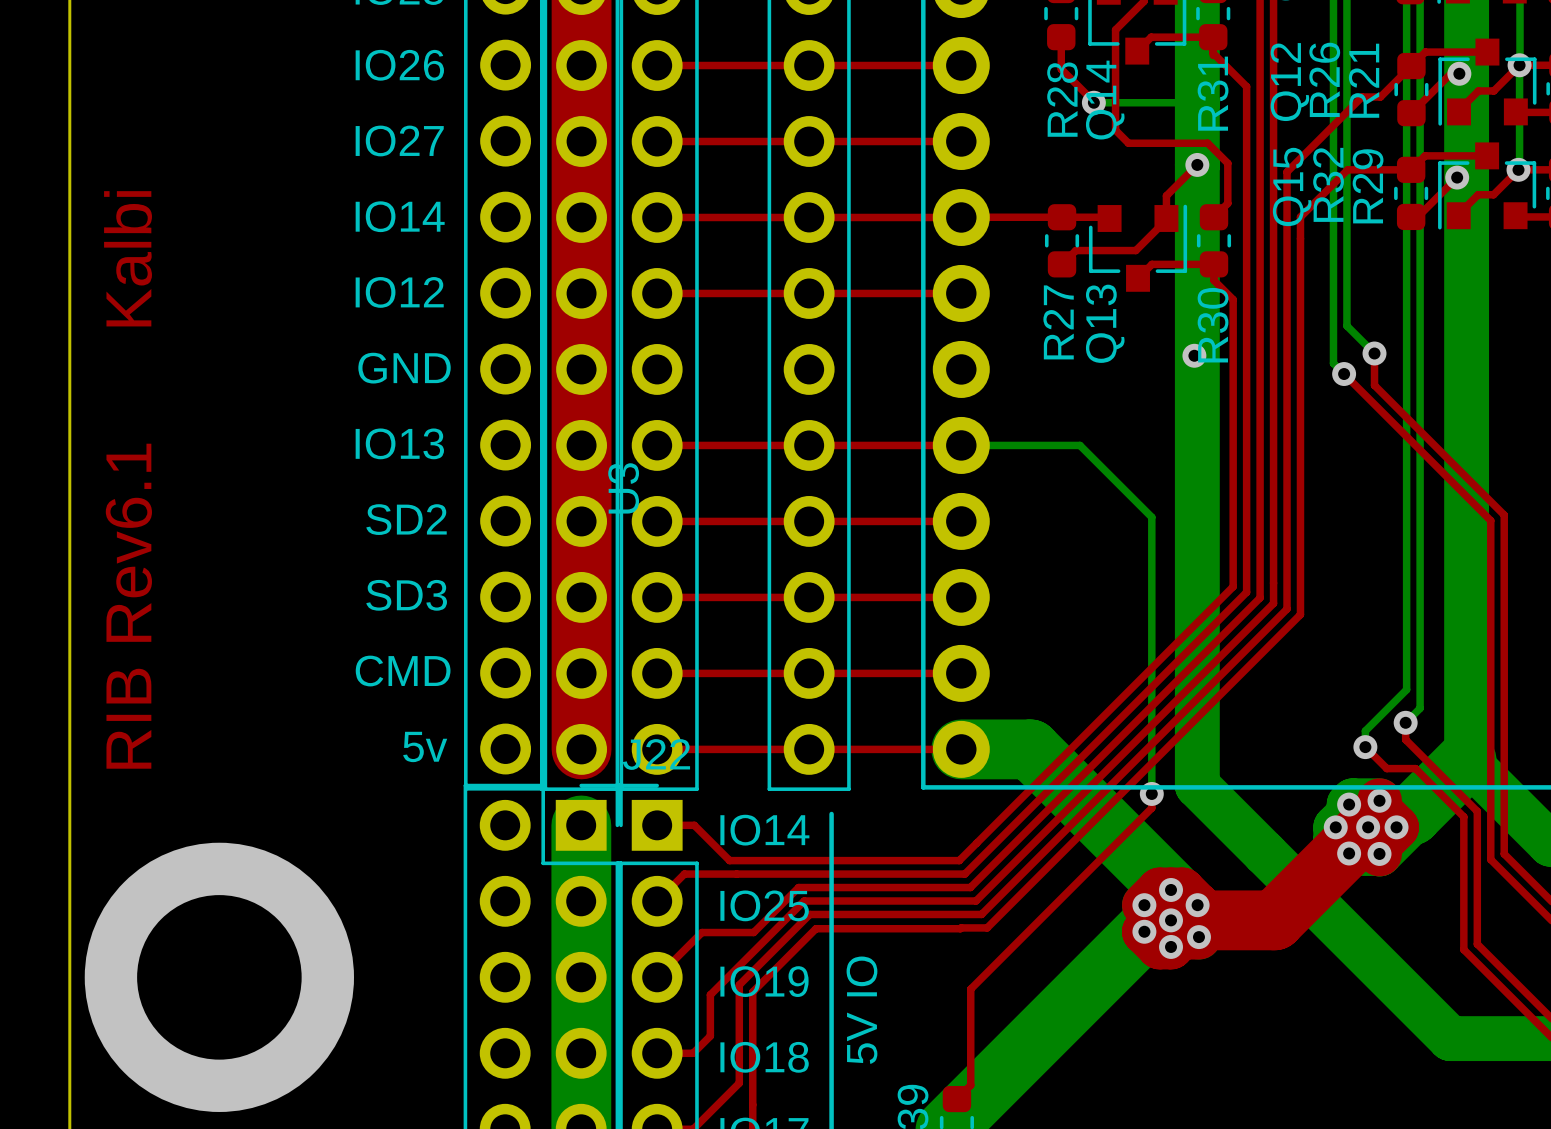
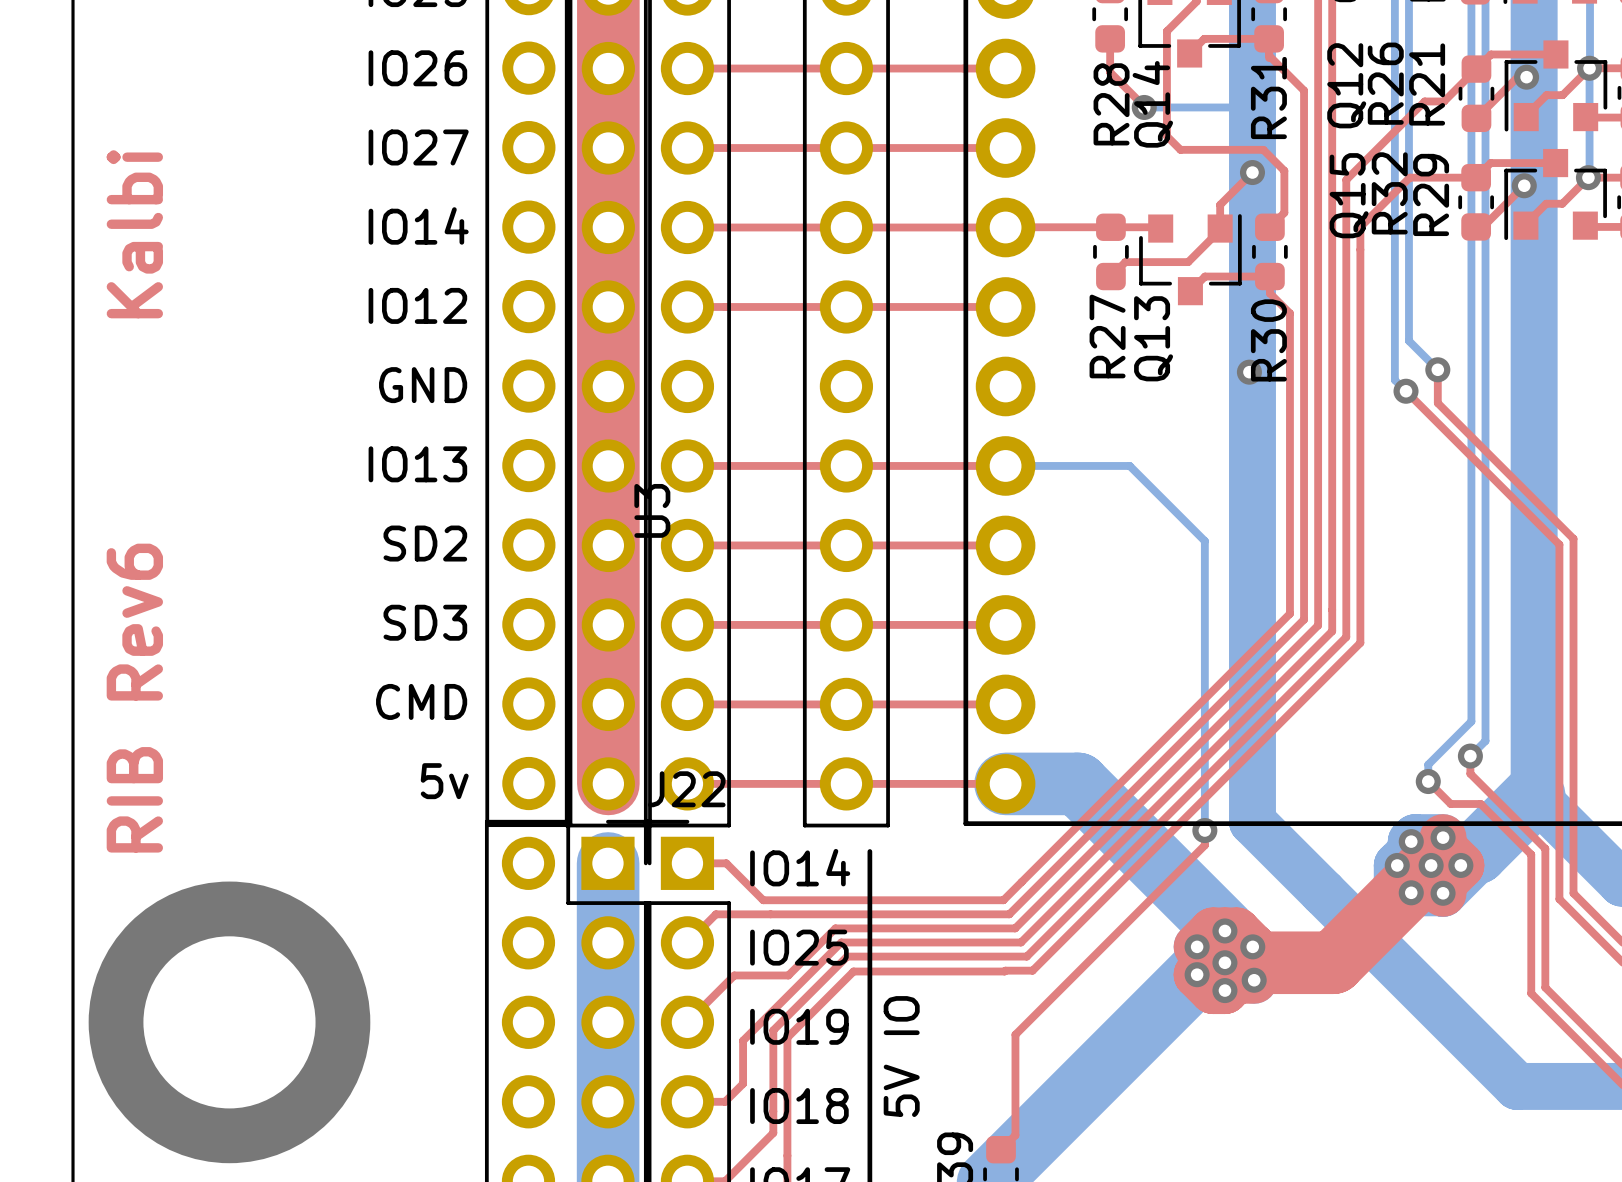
text: RIB Rev6.1 Kalbi (128, 479) -> RIB Rev6 Kalbi (134, 501)

